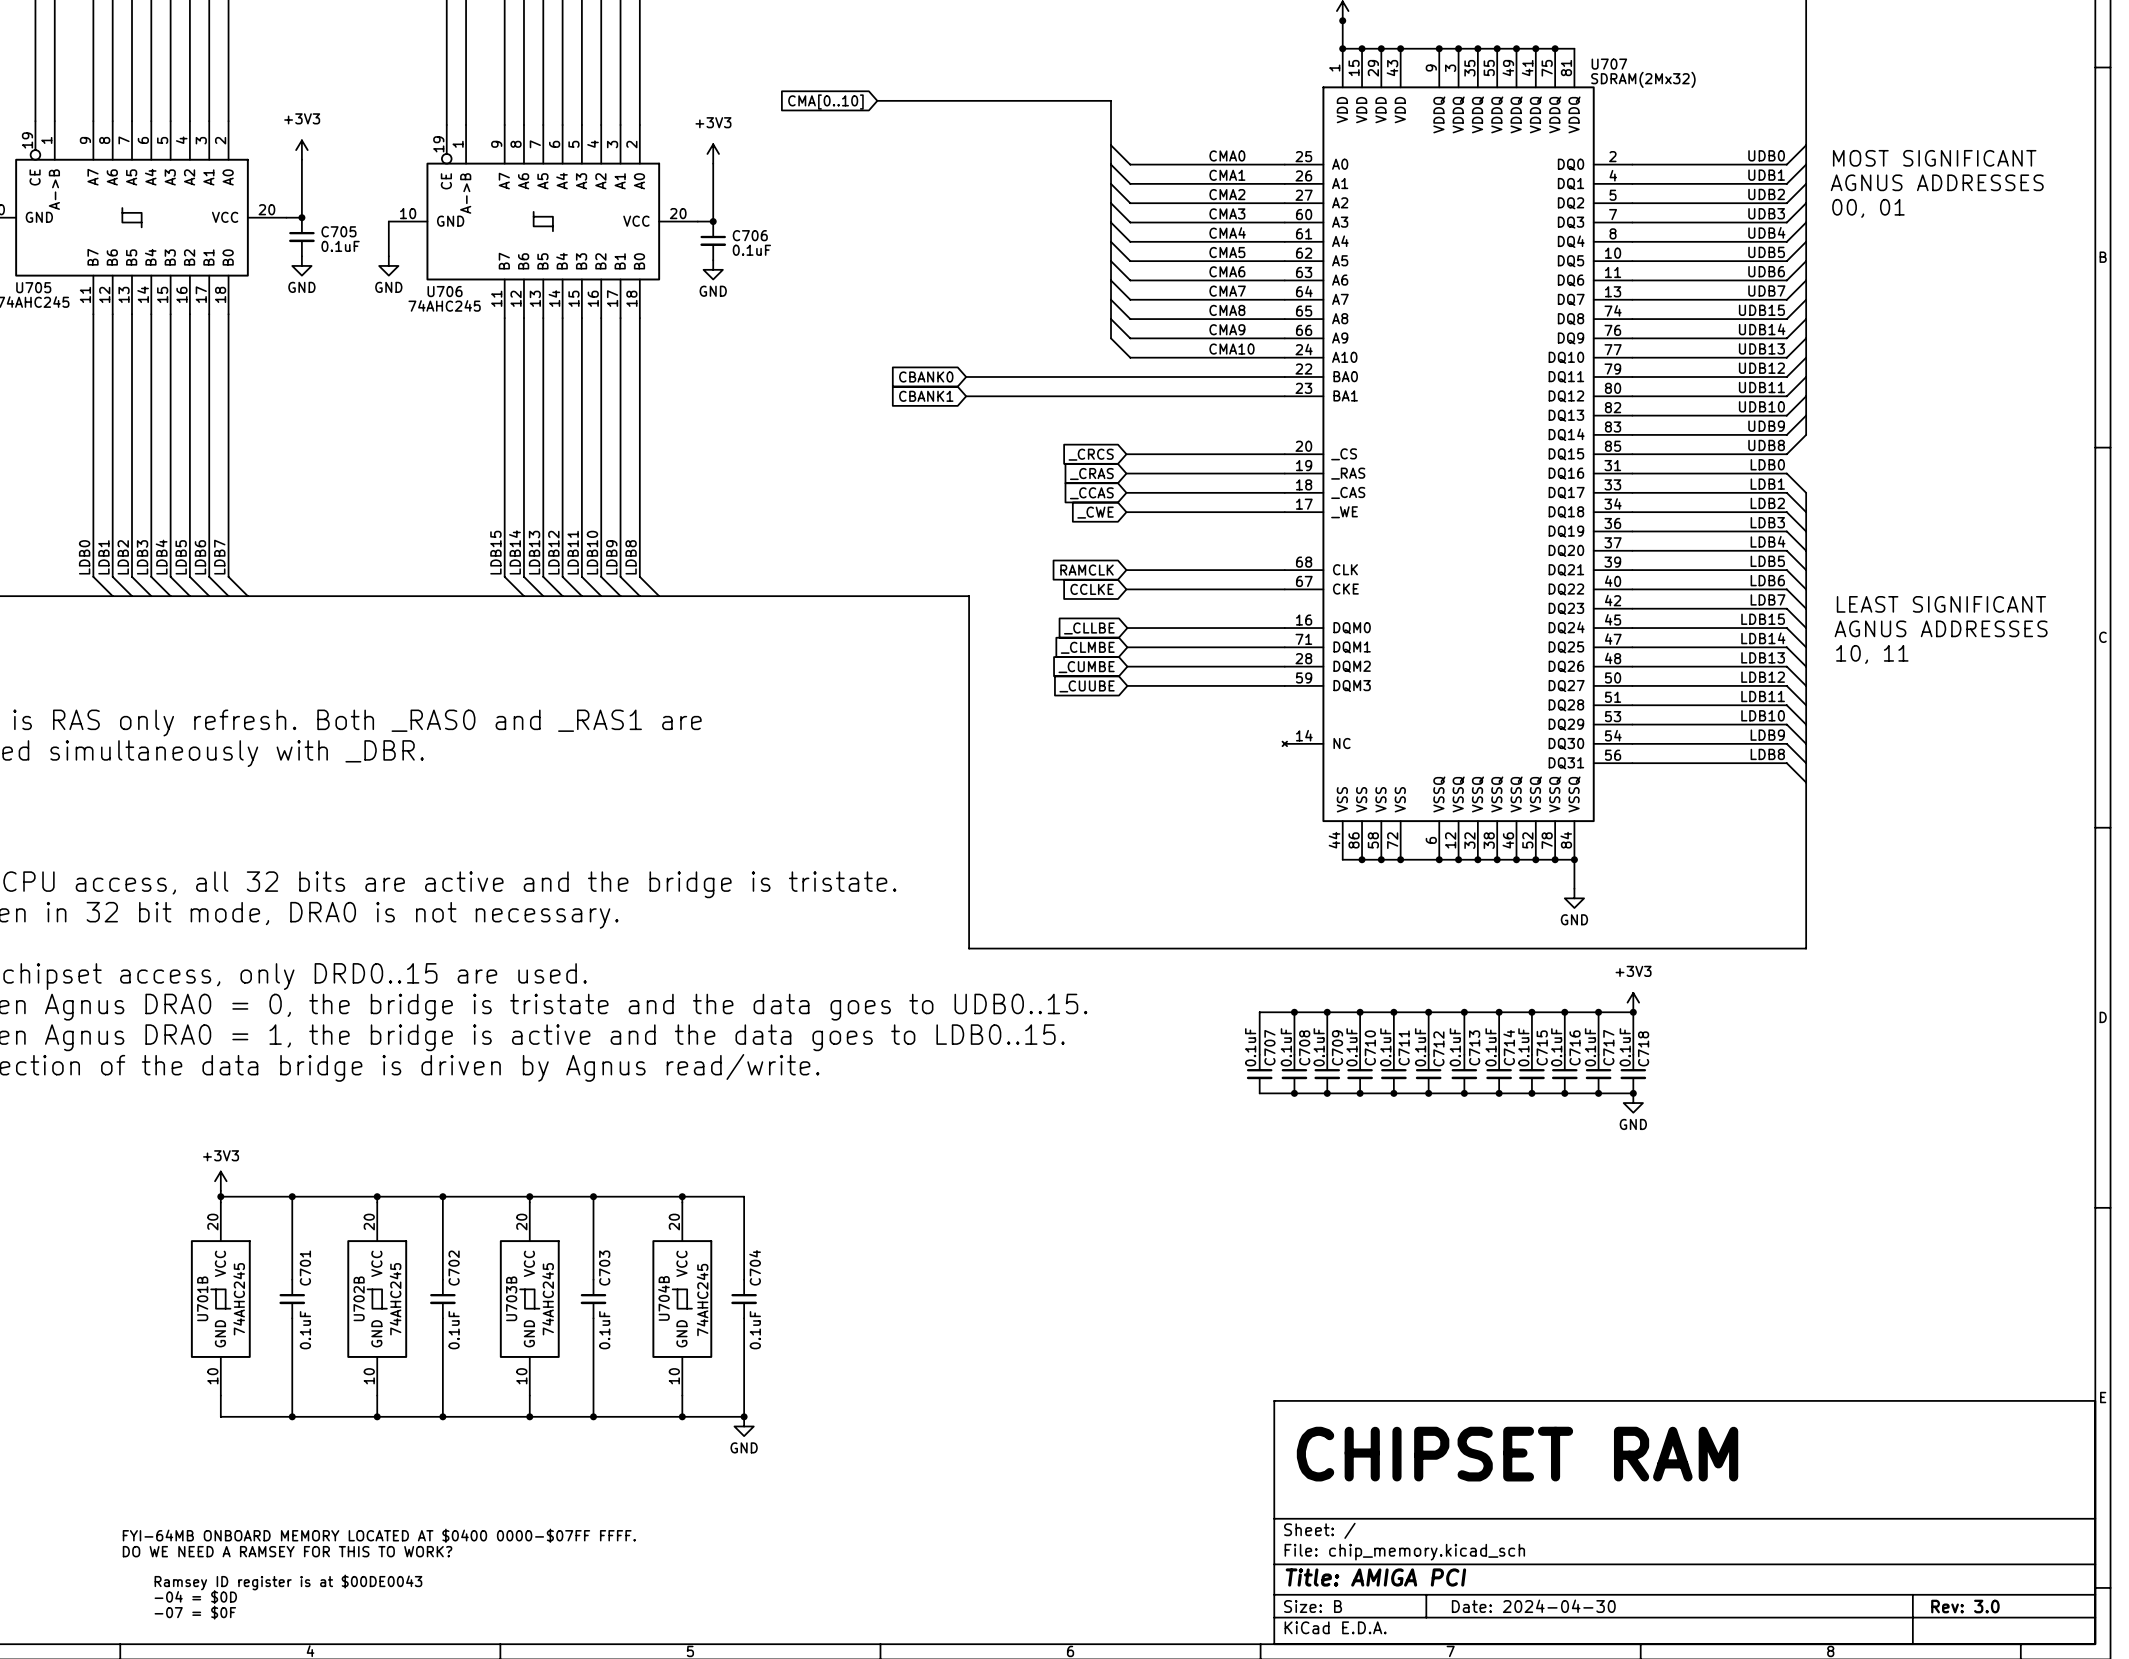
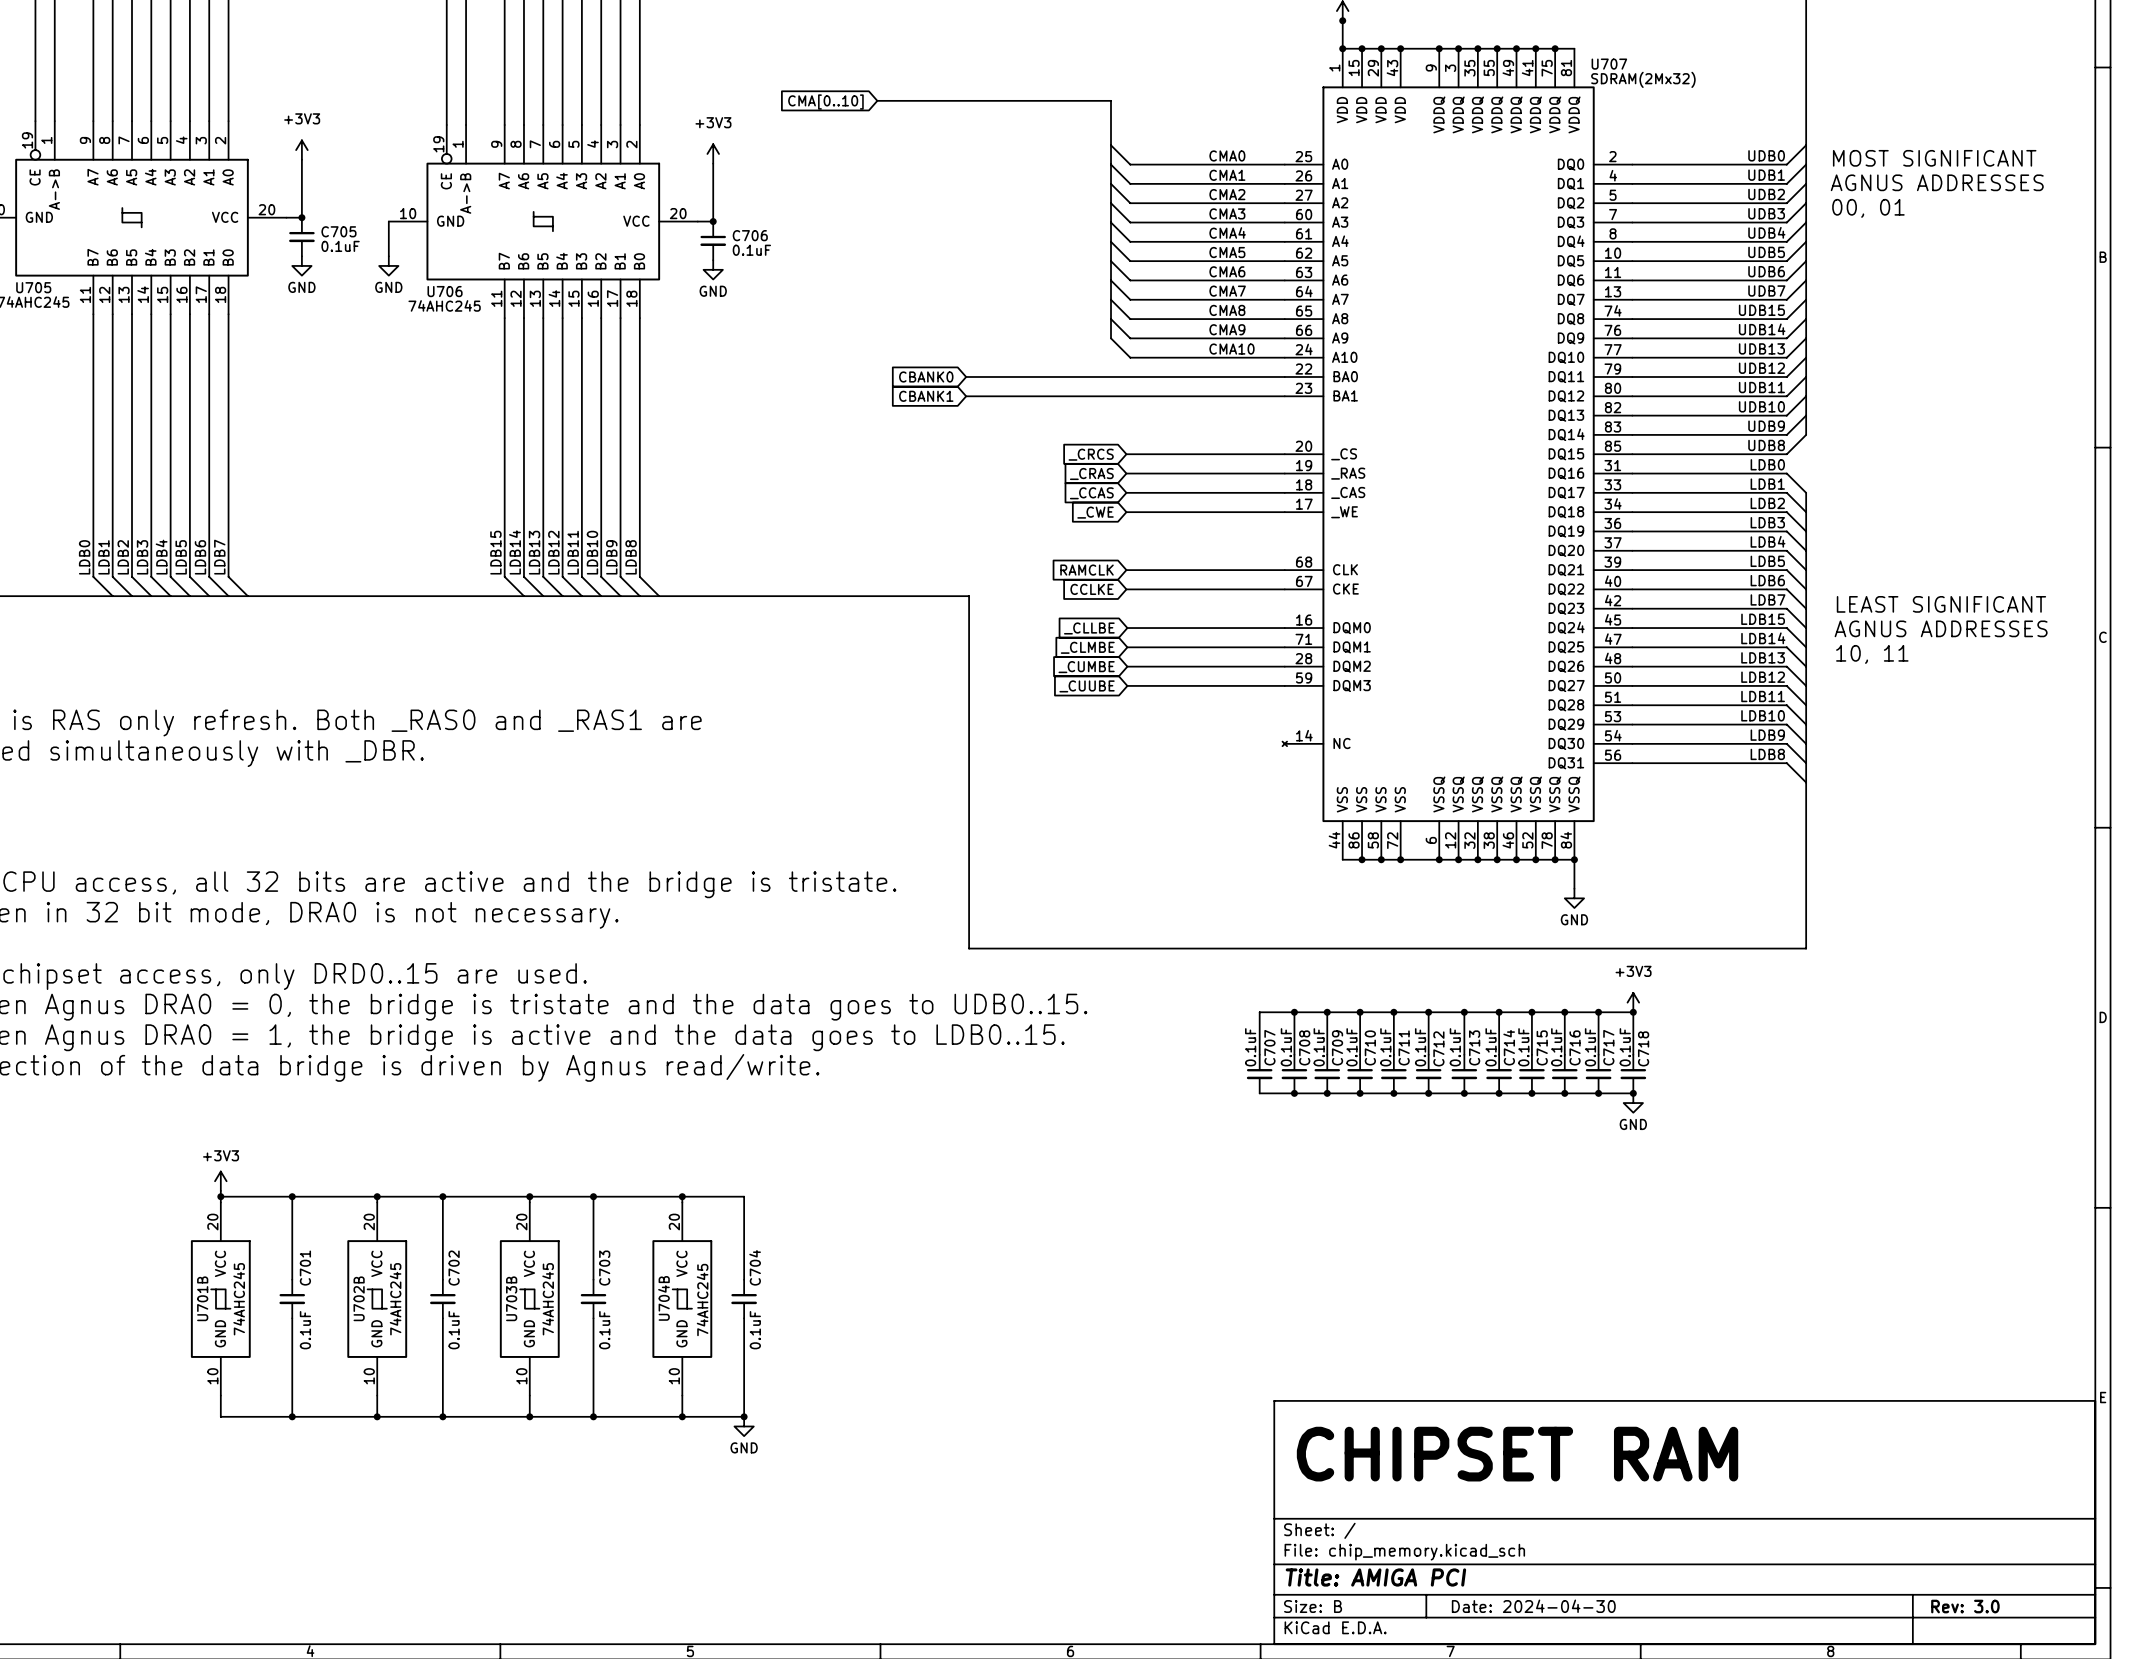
text: FYI-64MB ONBOARD MEMORY LOCATED AT $0400 0000-$07FF FFFF. (379, 1535) -> none
text: DO WE NEED A RAMSEY FOR THIS TO WORK? (287, 1551) -> none
text: Ramsey ID register is at $00DE0043 (288, 1582) -> none
text: -04 = $0D (195, 1597) -> none
text: -07 = $0F (195, 1612) -> none

